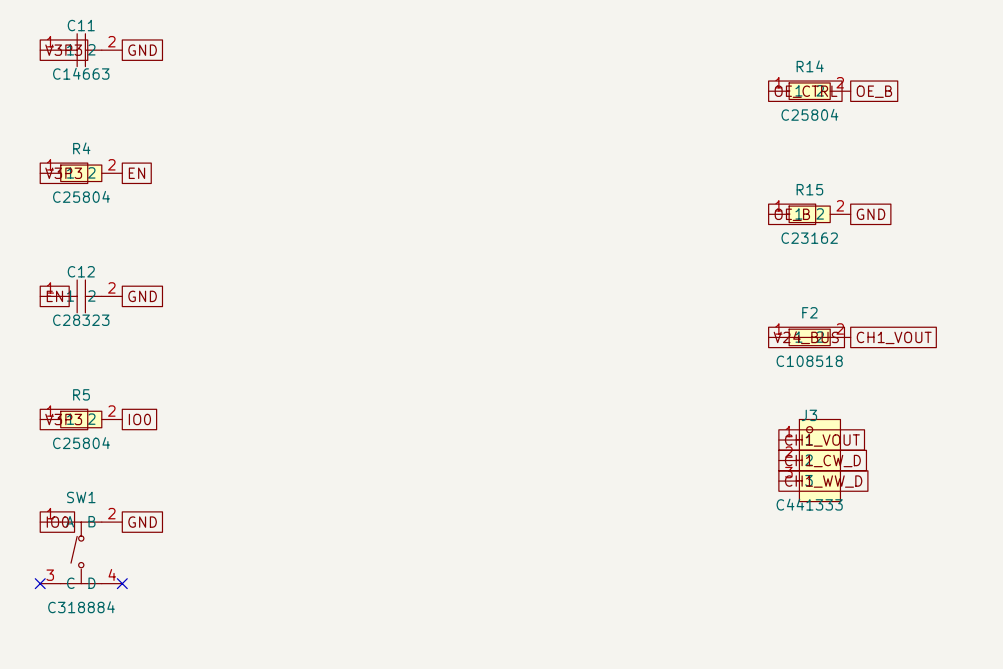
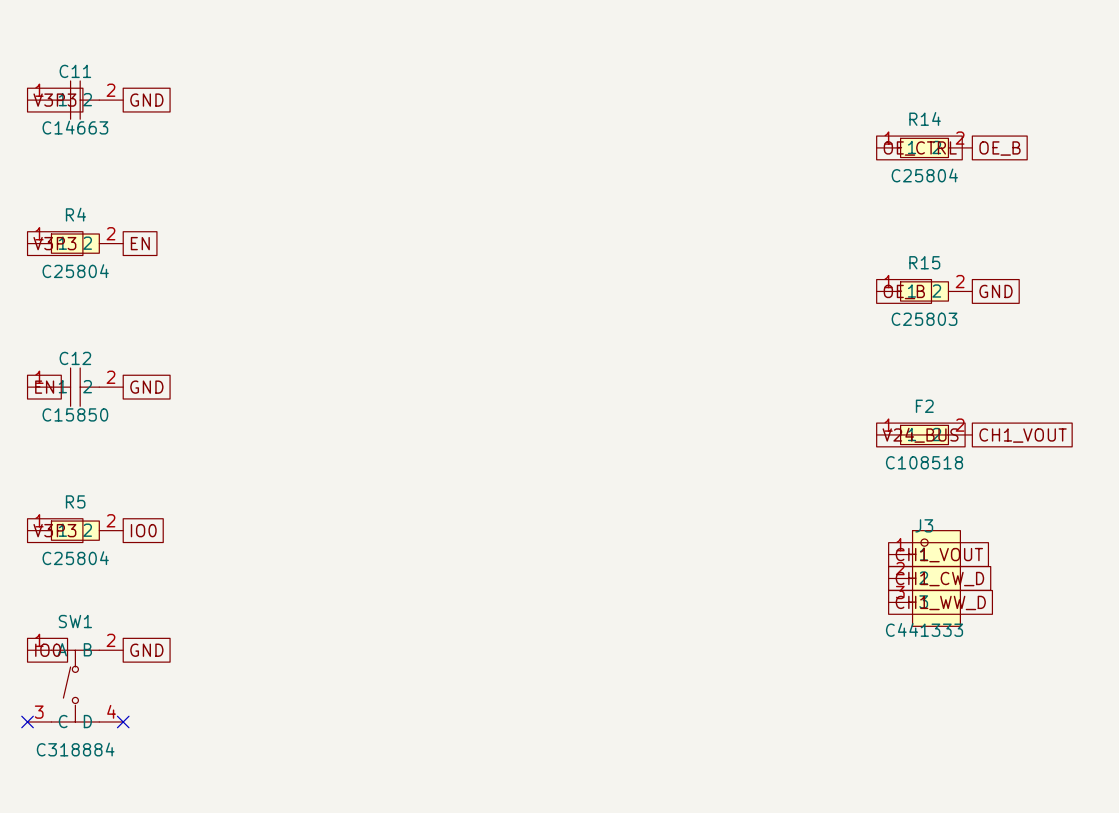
R15 value: C23162 (809, 238) -> C25803 (924, 319)
C12 value: C28323 (81, 320) -> C15850 (75, 414)

